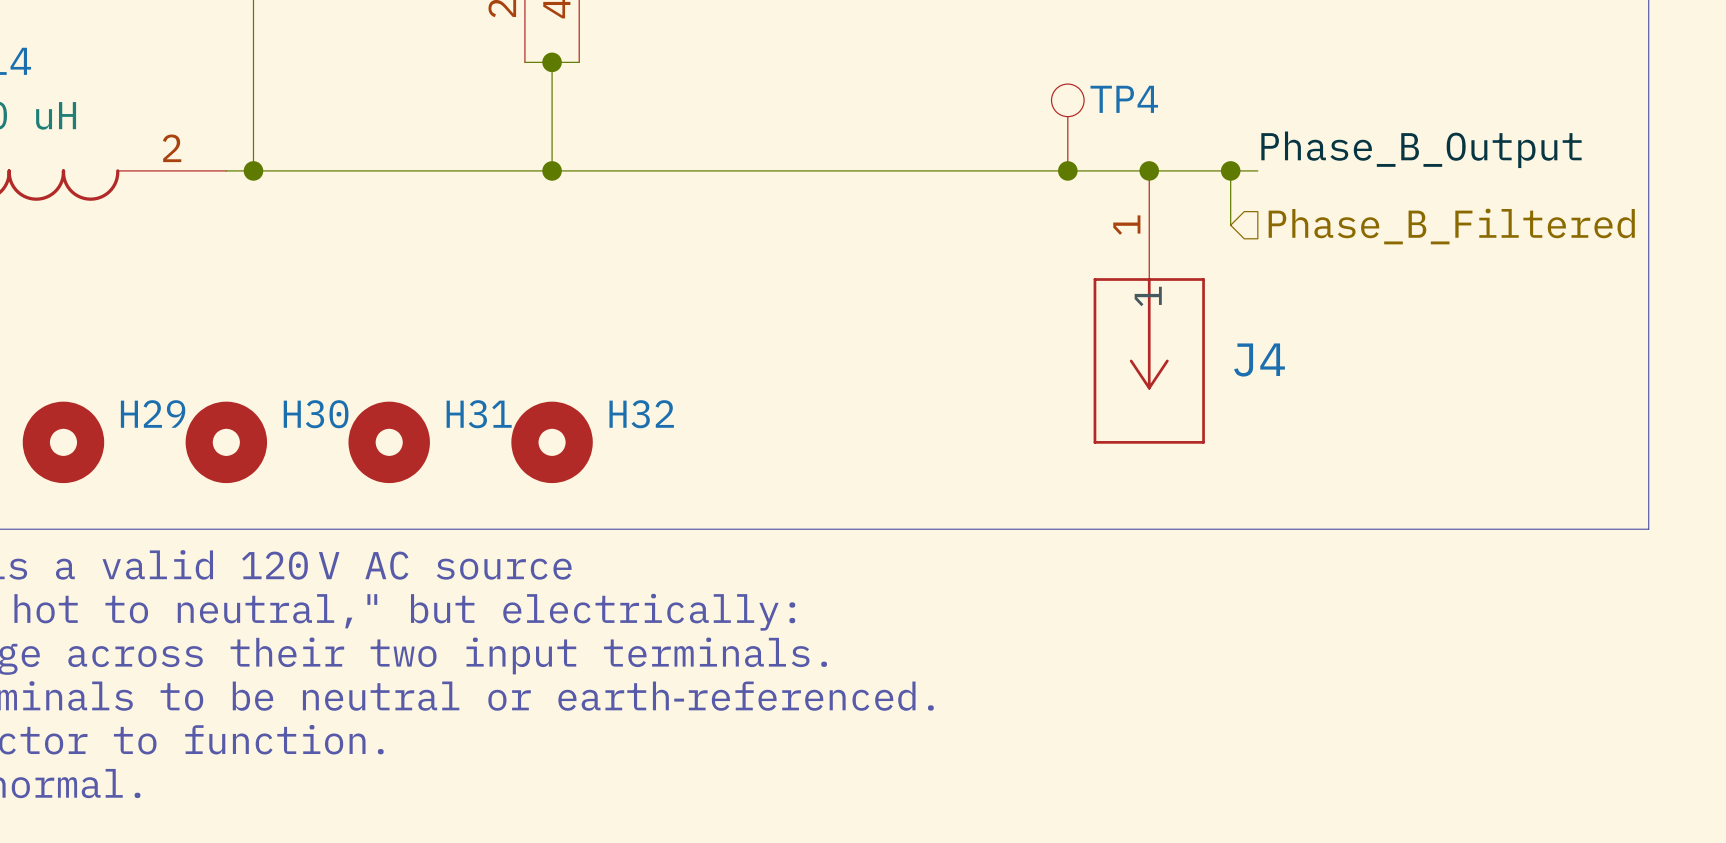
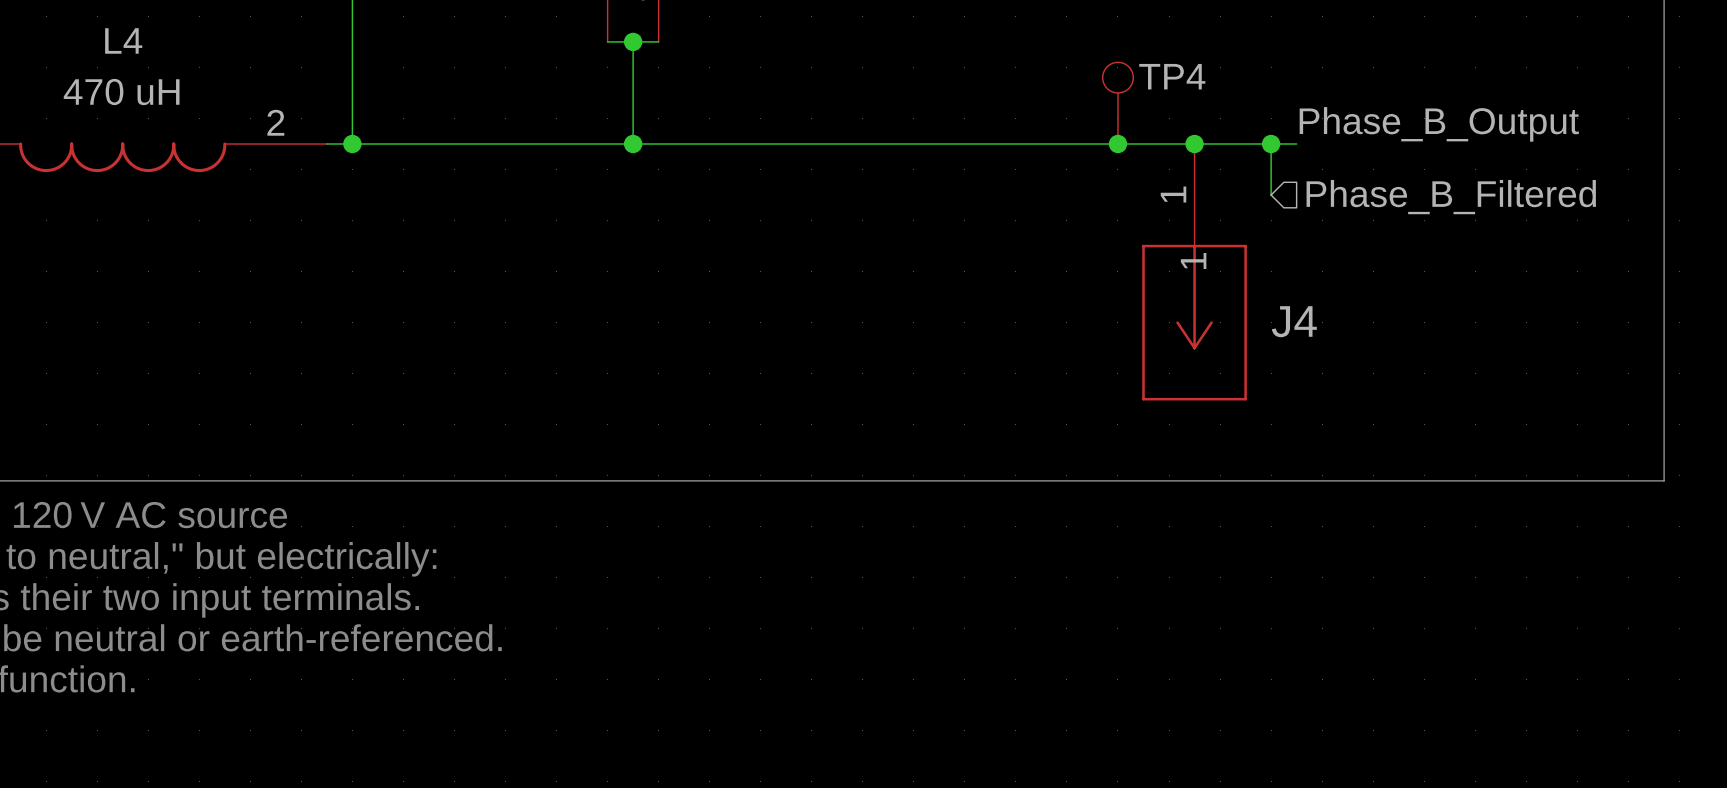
H29: (63, 442) -> none
H30: (226, 442) -> none
H31: (389, 442) -> none
H32: (552, 442) -> none

